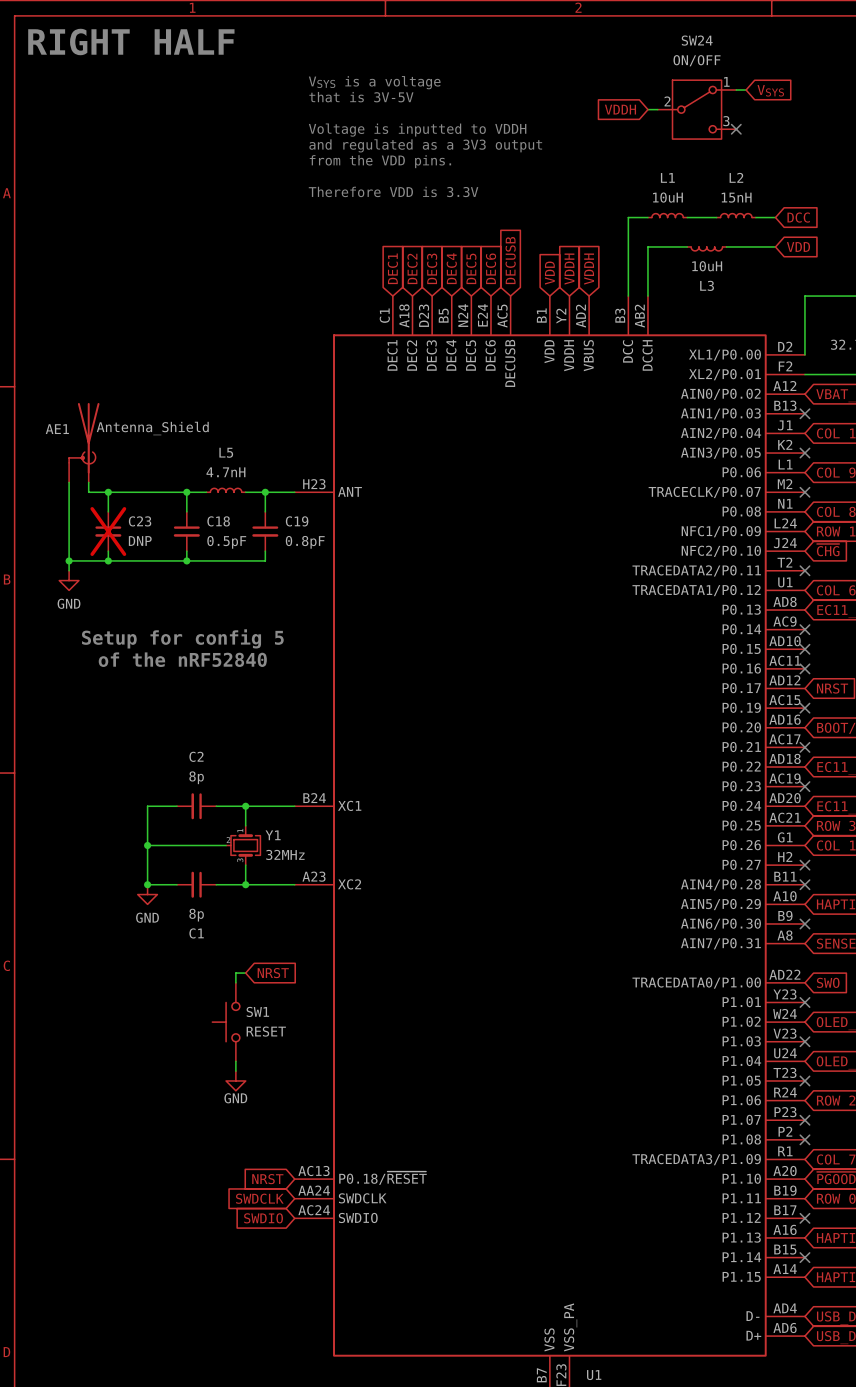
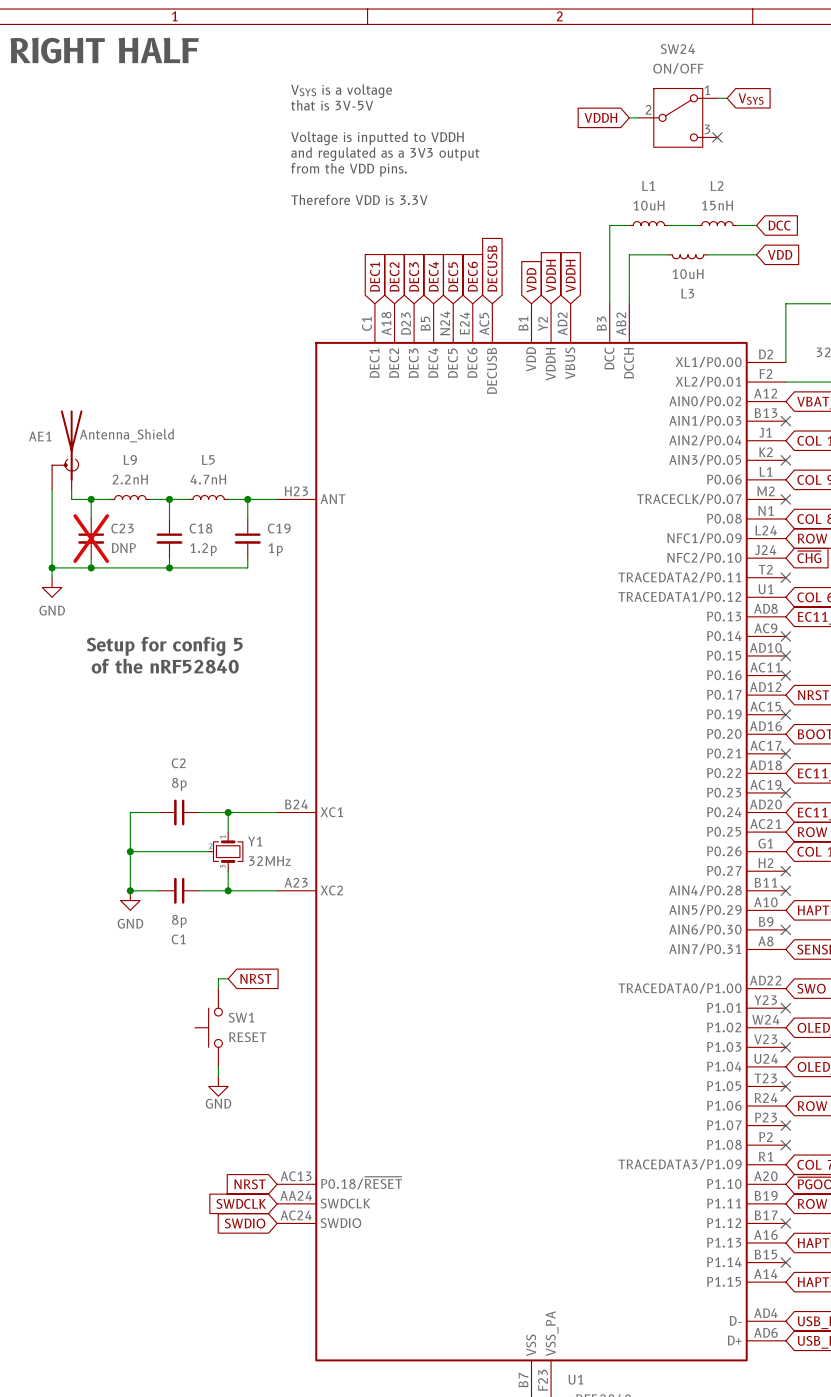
L9: none -> 2.2nH (130, 497)
wire: (127, 492) (167, 492) -> none
C18 value: 0.5pF (226, 542) -> 1.2p (203, 549)
C19 value: 0.8pF (305, 542) -> 1p (275, 549)

